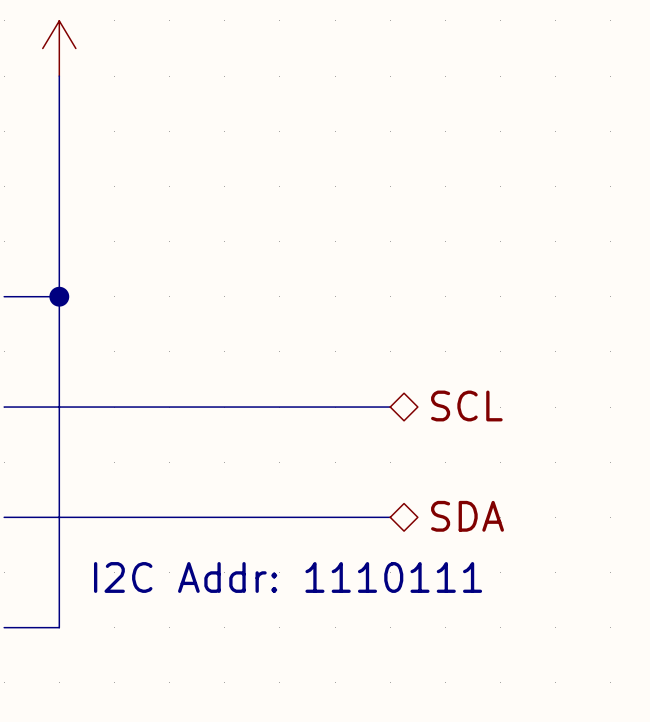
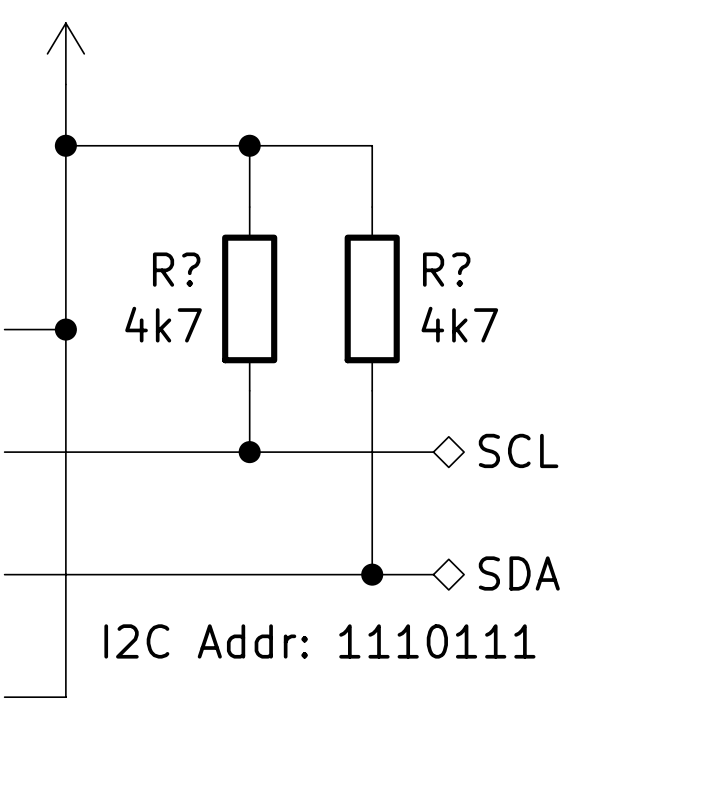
wire: none -> (65, 145) (372, 145) (372, 207)
junction: none -> (65, 145)
wire: none -> (249, 145) (249, 207)
junction: none -> (249, 145)
R?: none -> 4k7 (249, 298)
R?: none -> 4k7 (372, 298)
wire: none -> (249, 390) (249, 452)
wire: none -> (372, 390) (372, 574)
junction: none -> (249, 452)
junction: none -> (372, 574)

